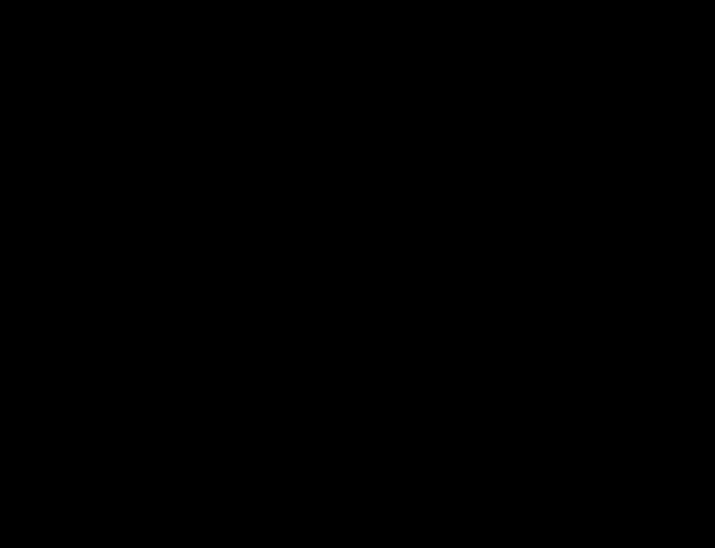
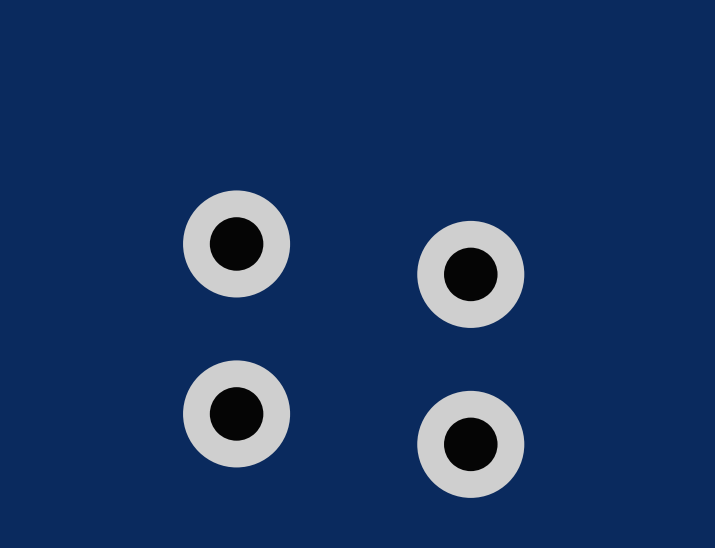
part: none -> (236, 328)
part: none -> (470, 359)

